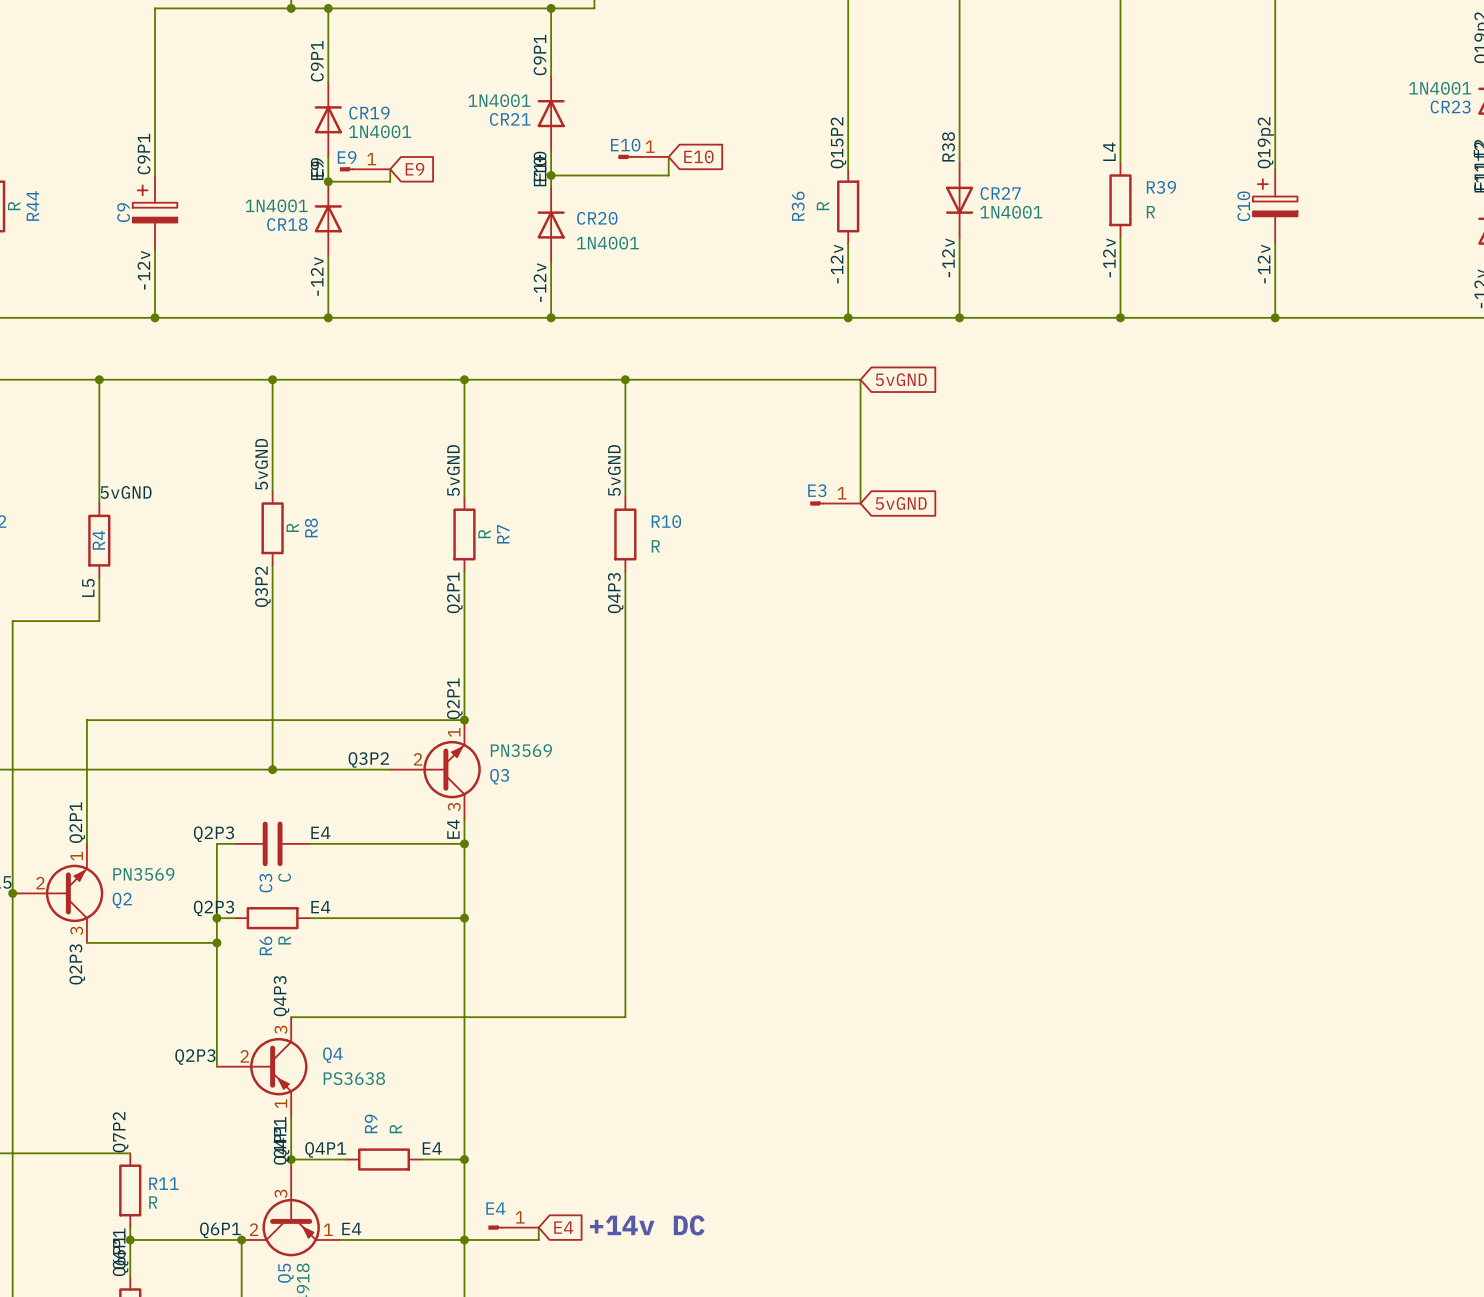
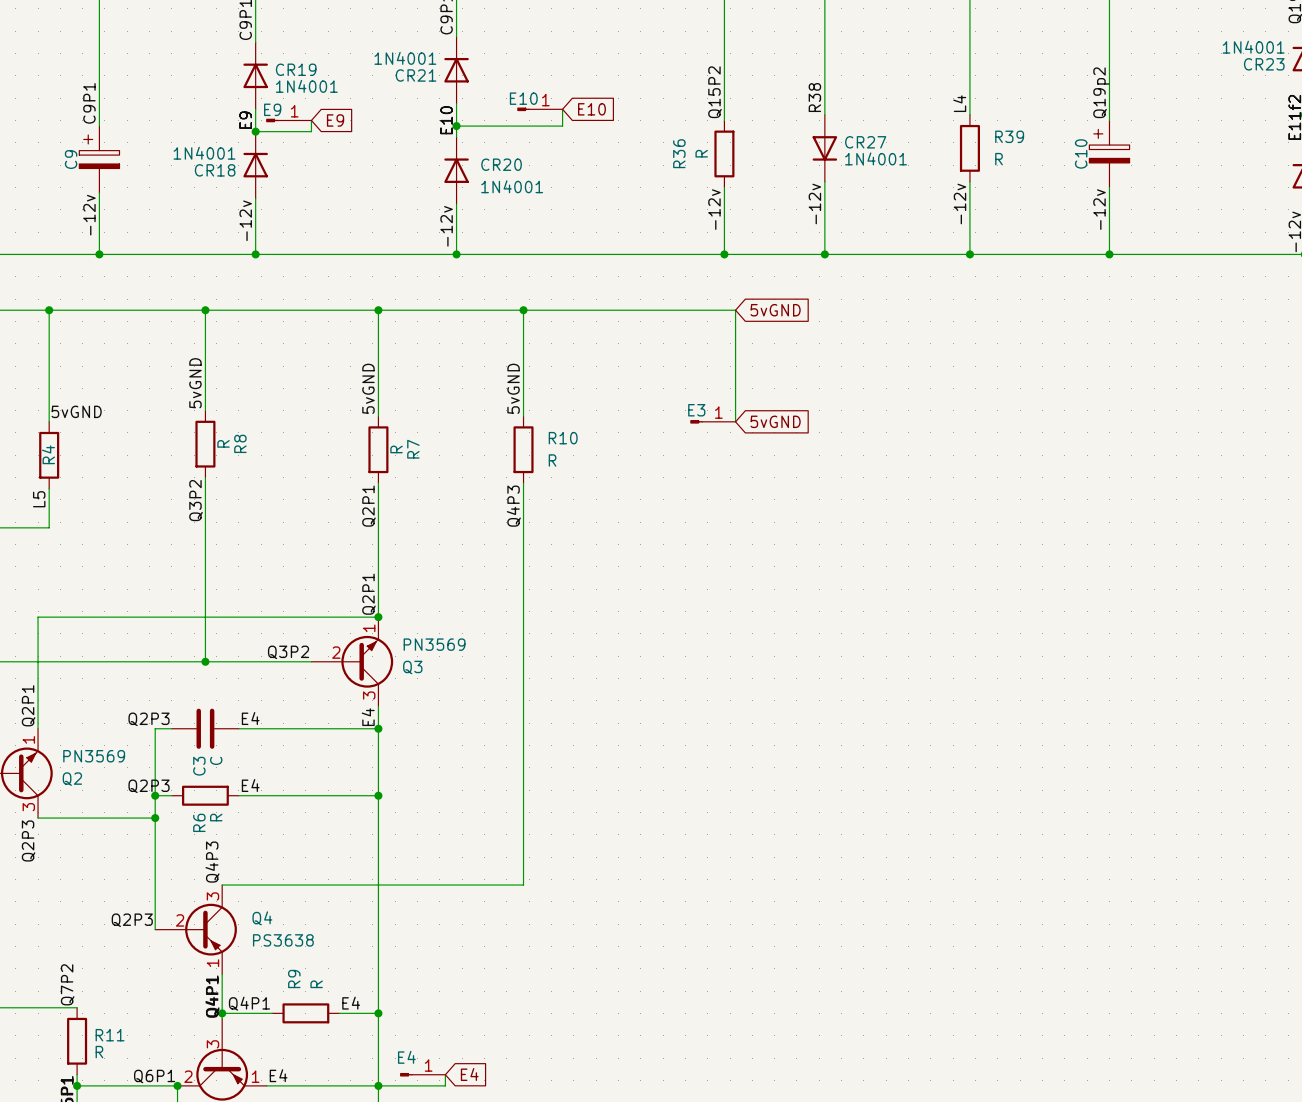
text: +14v DC (647, 1225) -> none

